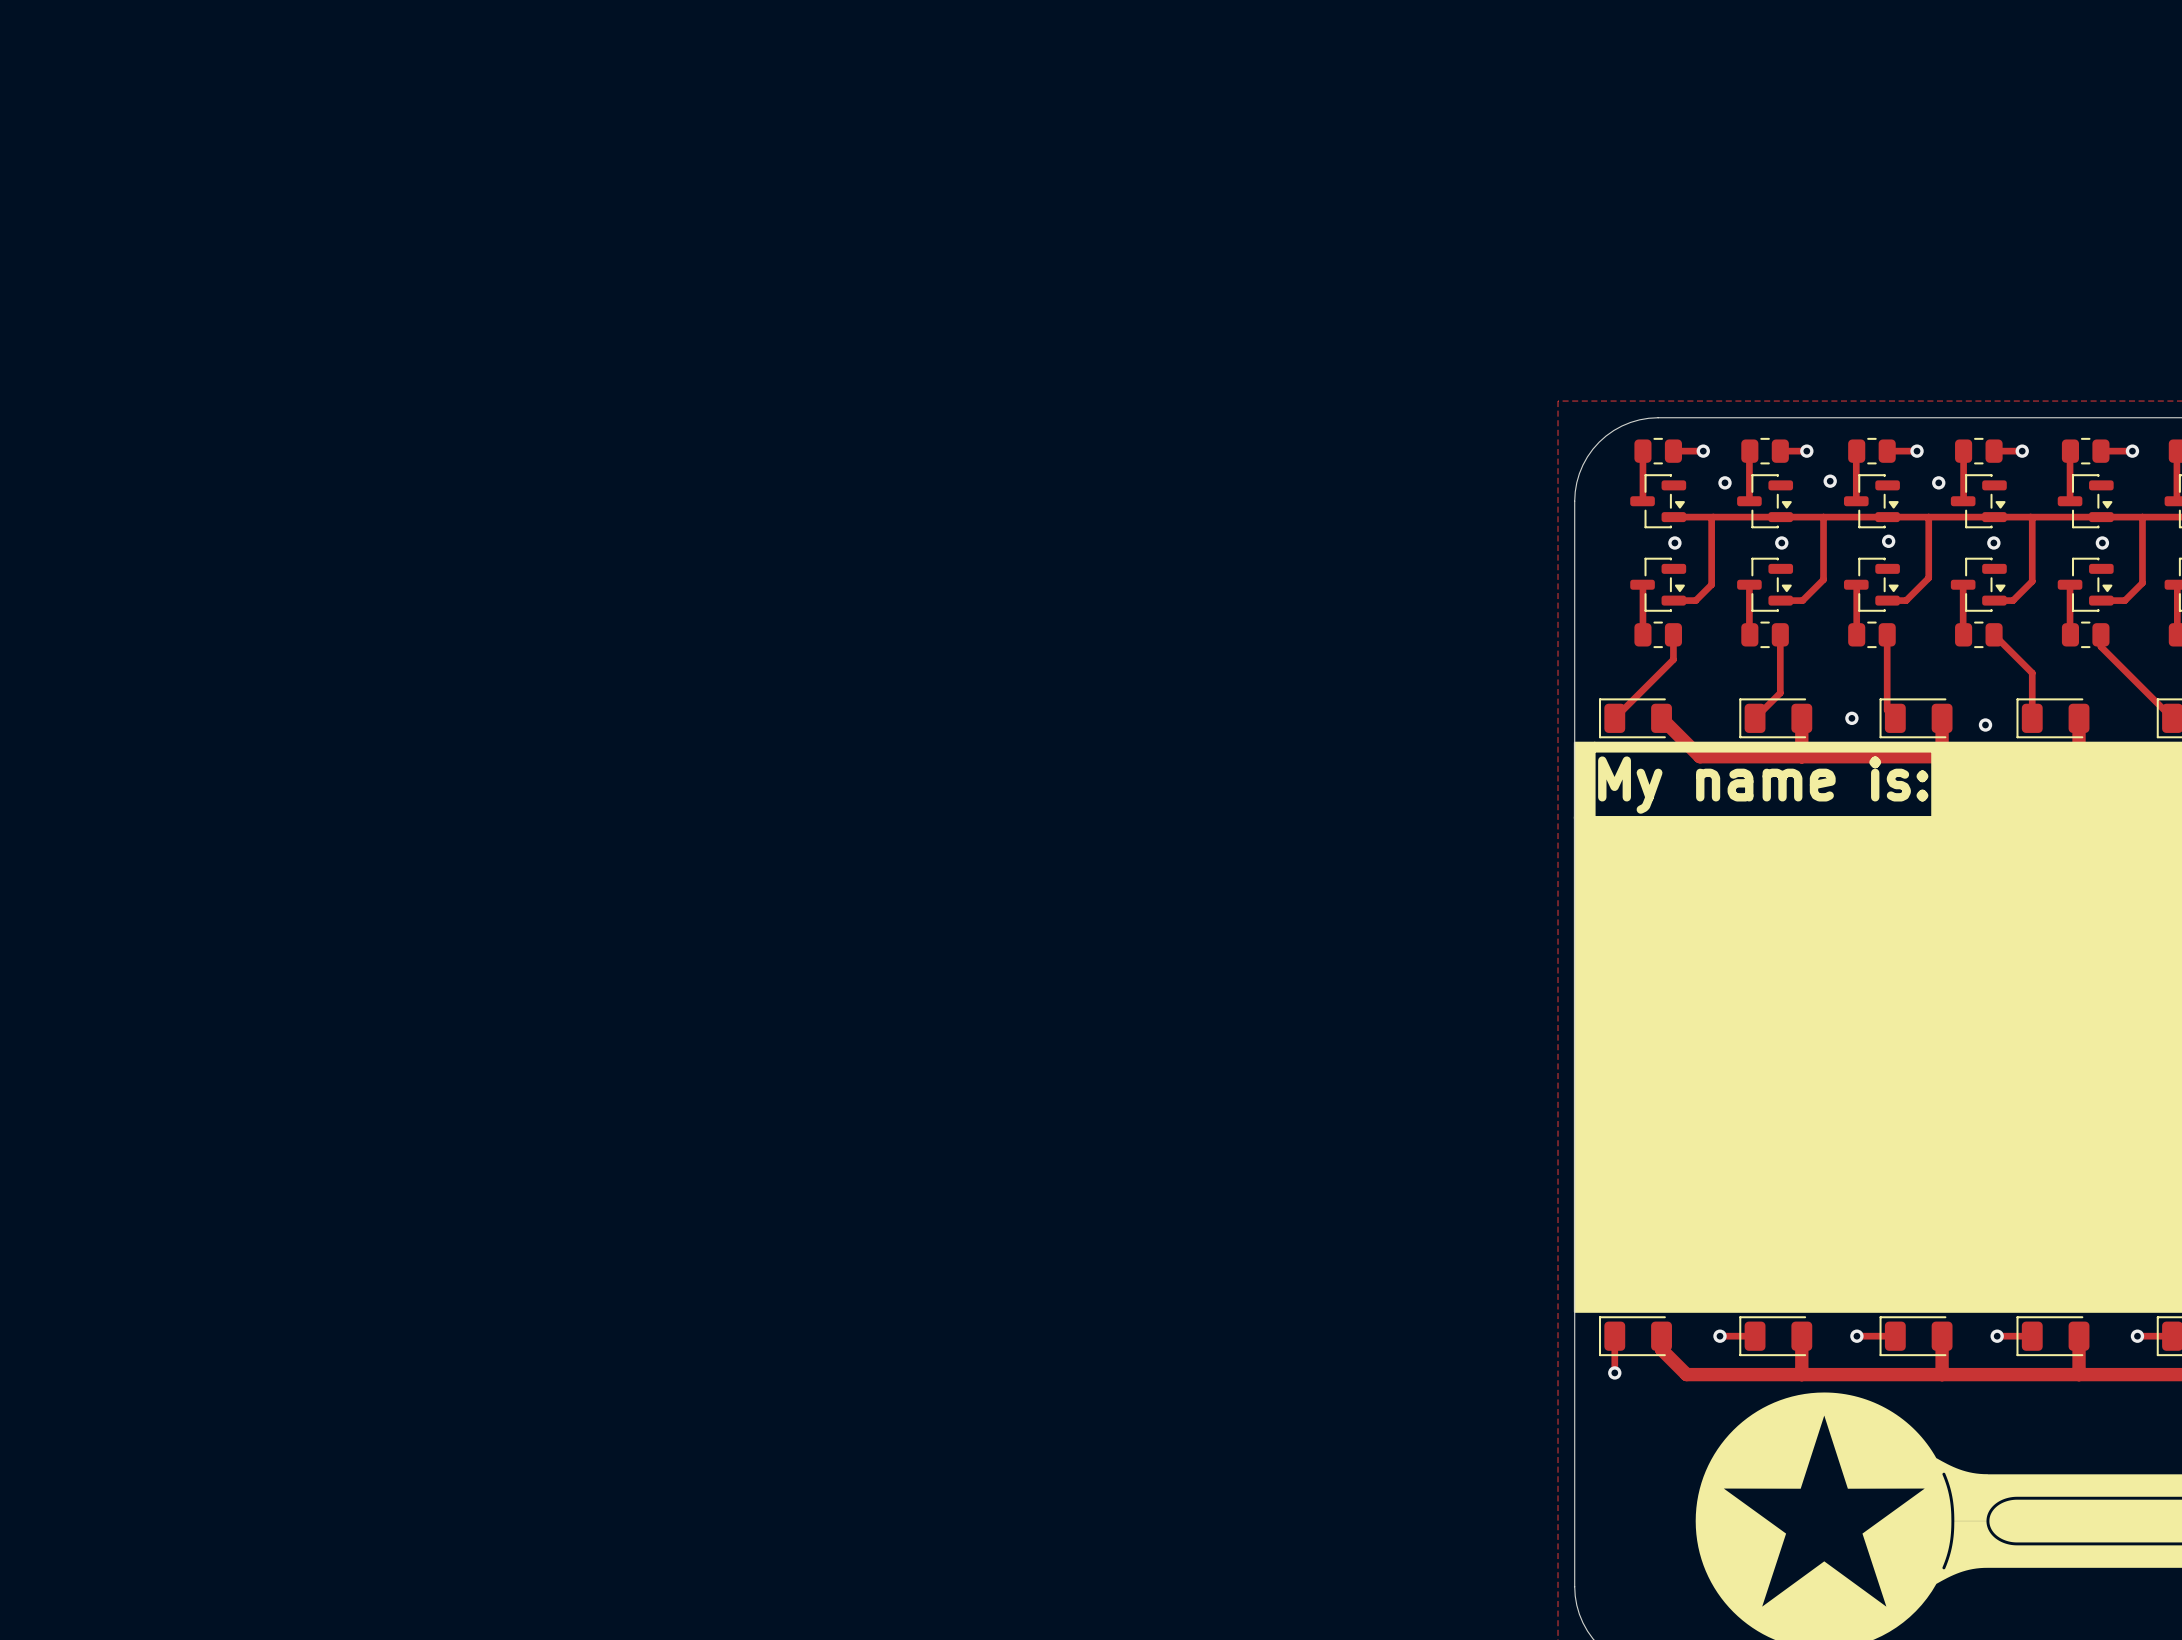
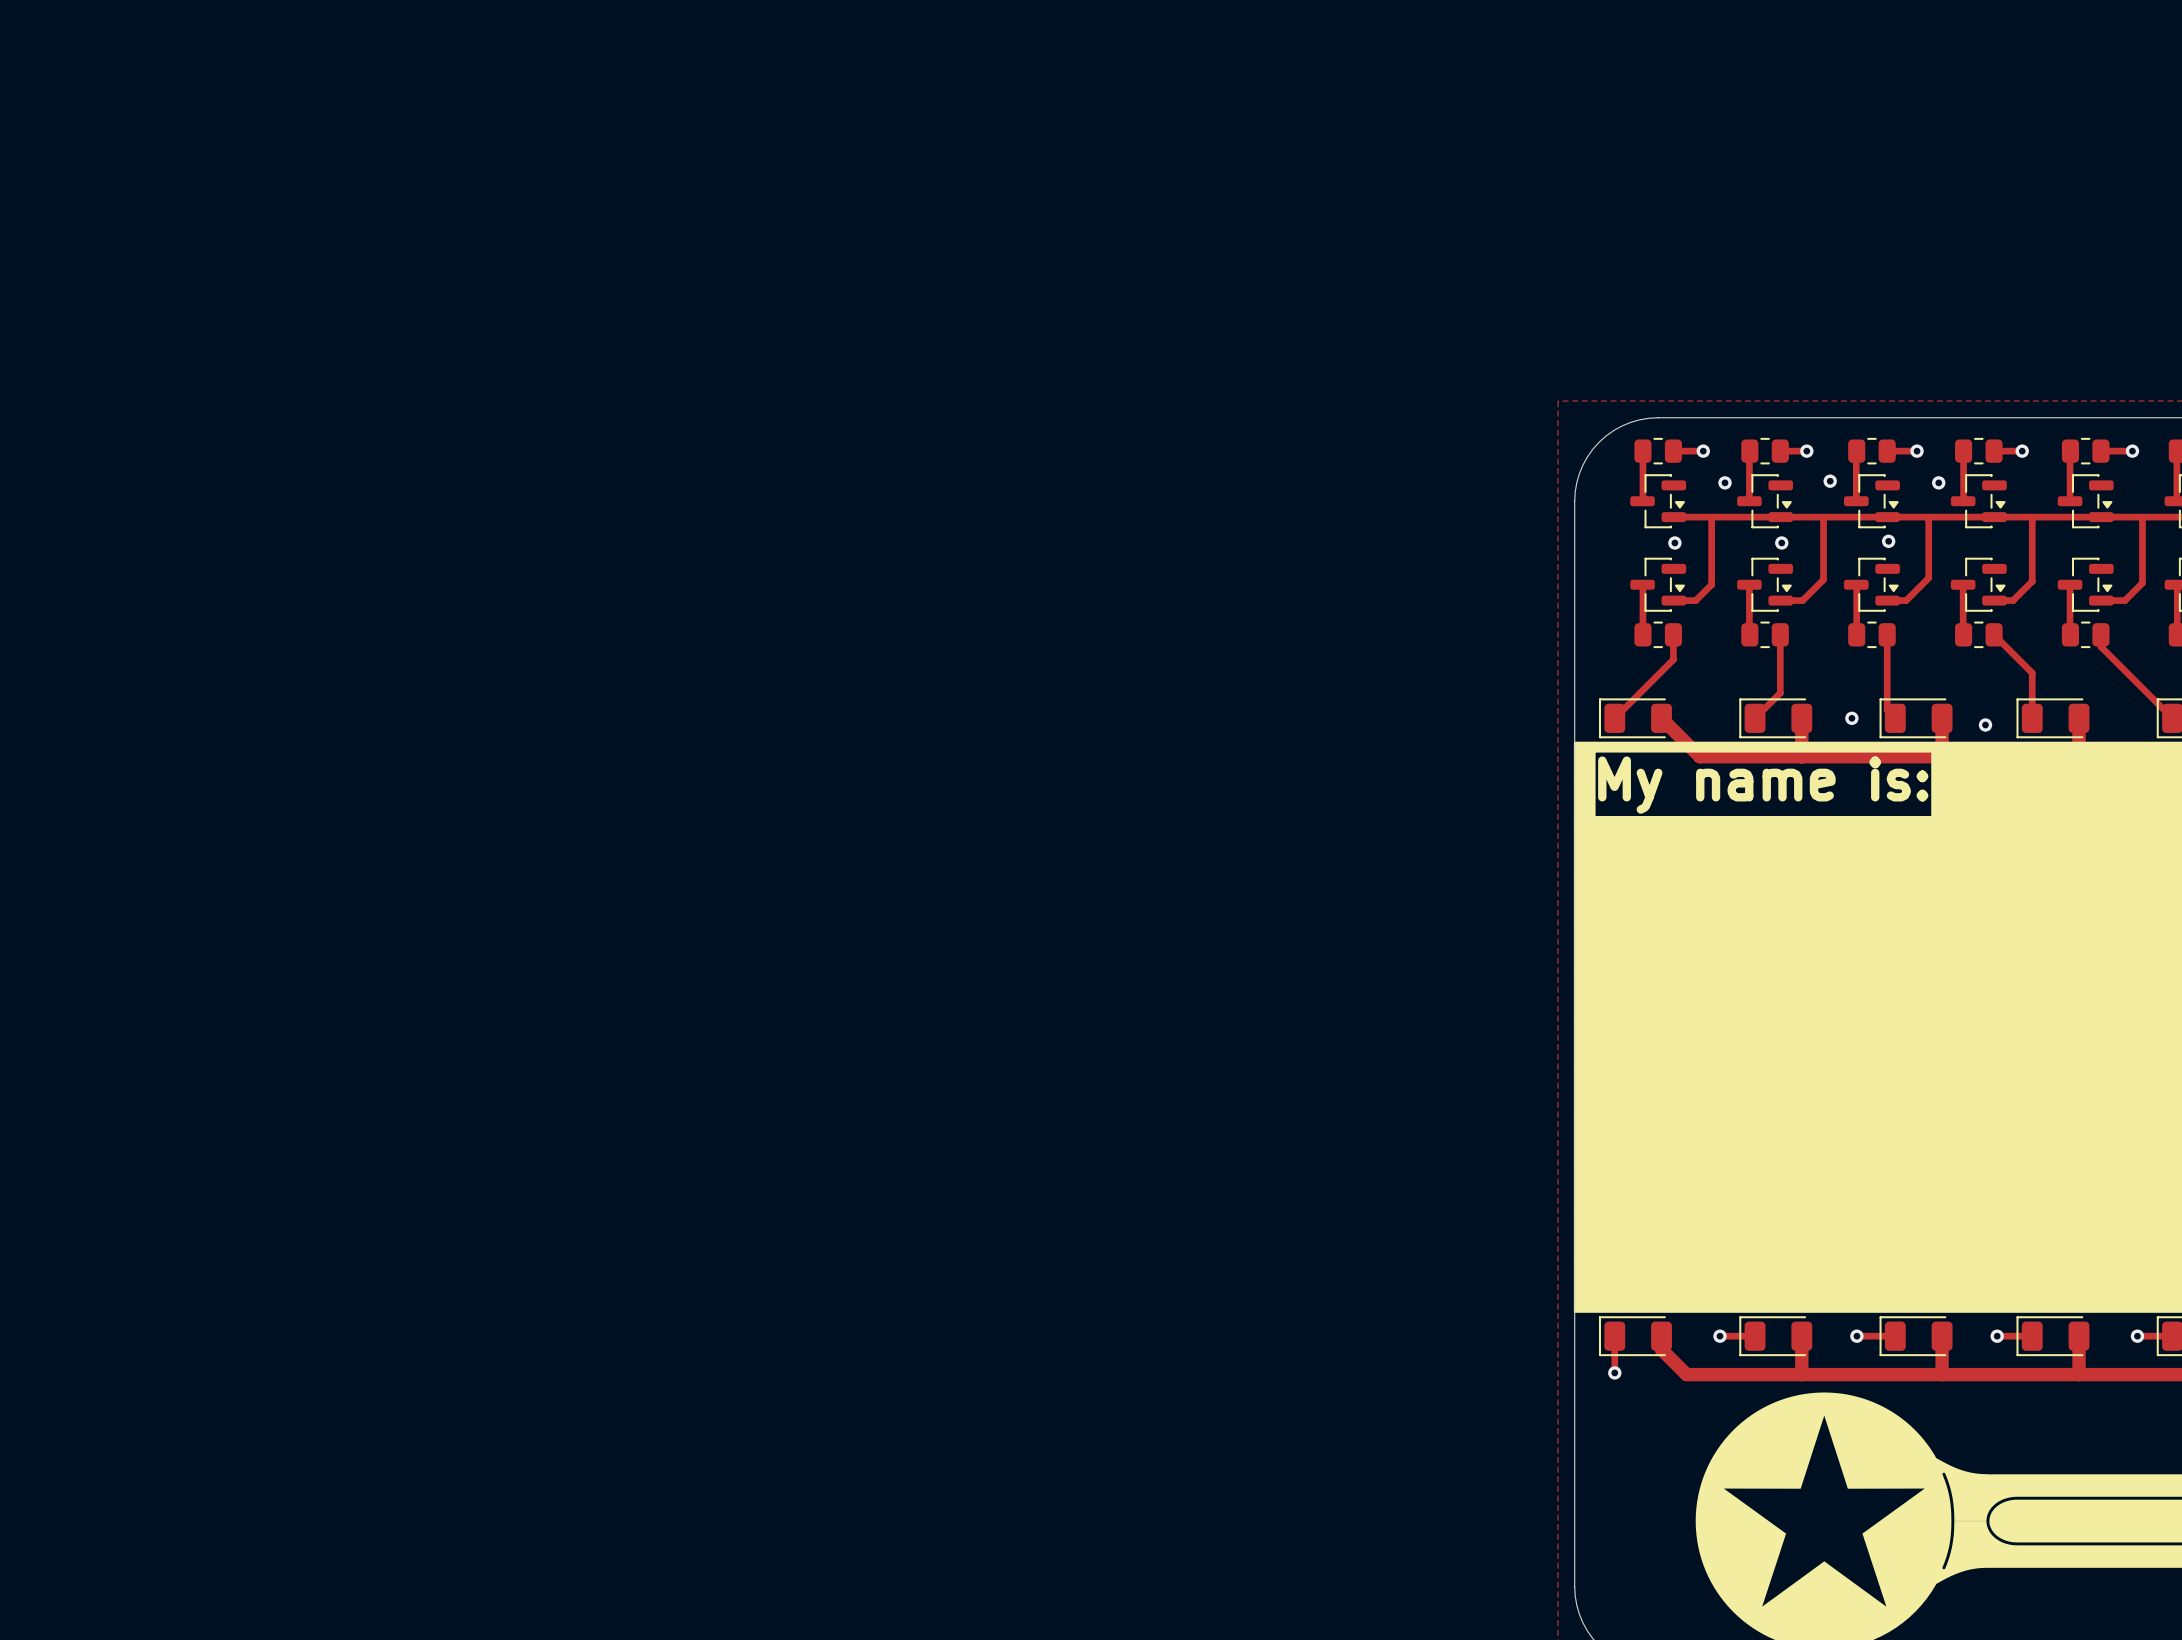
via: (1993, 542) -> none
via: (2102, 542) -> none

